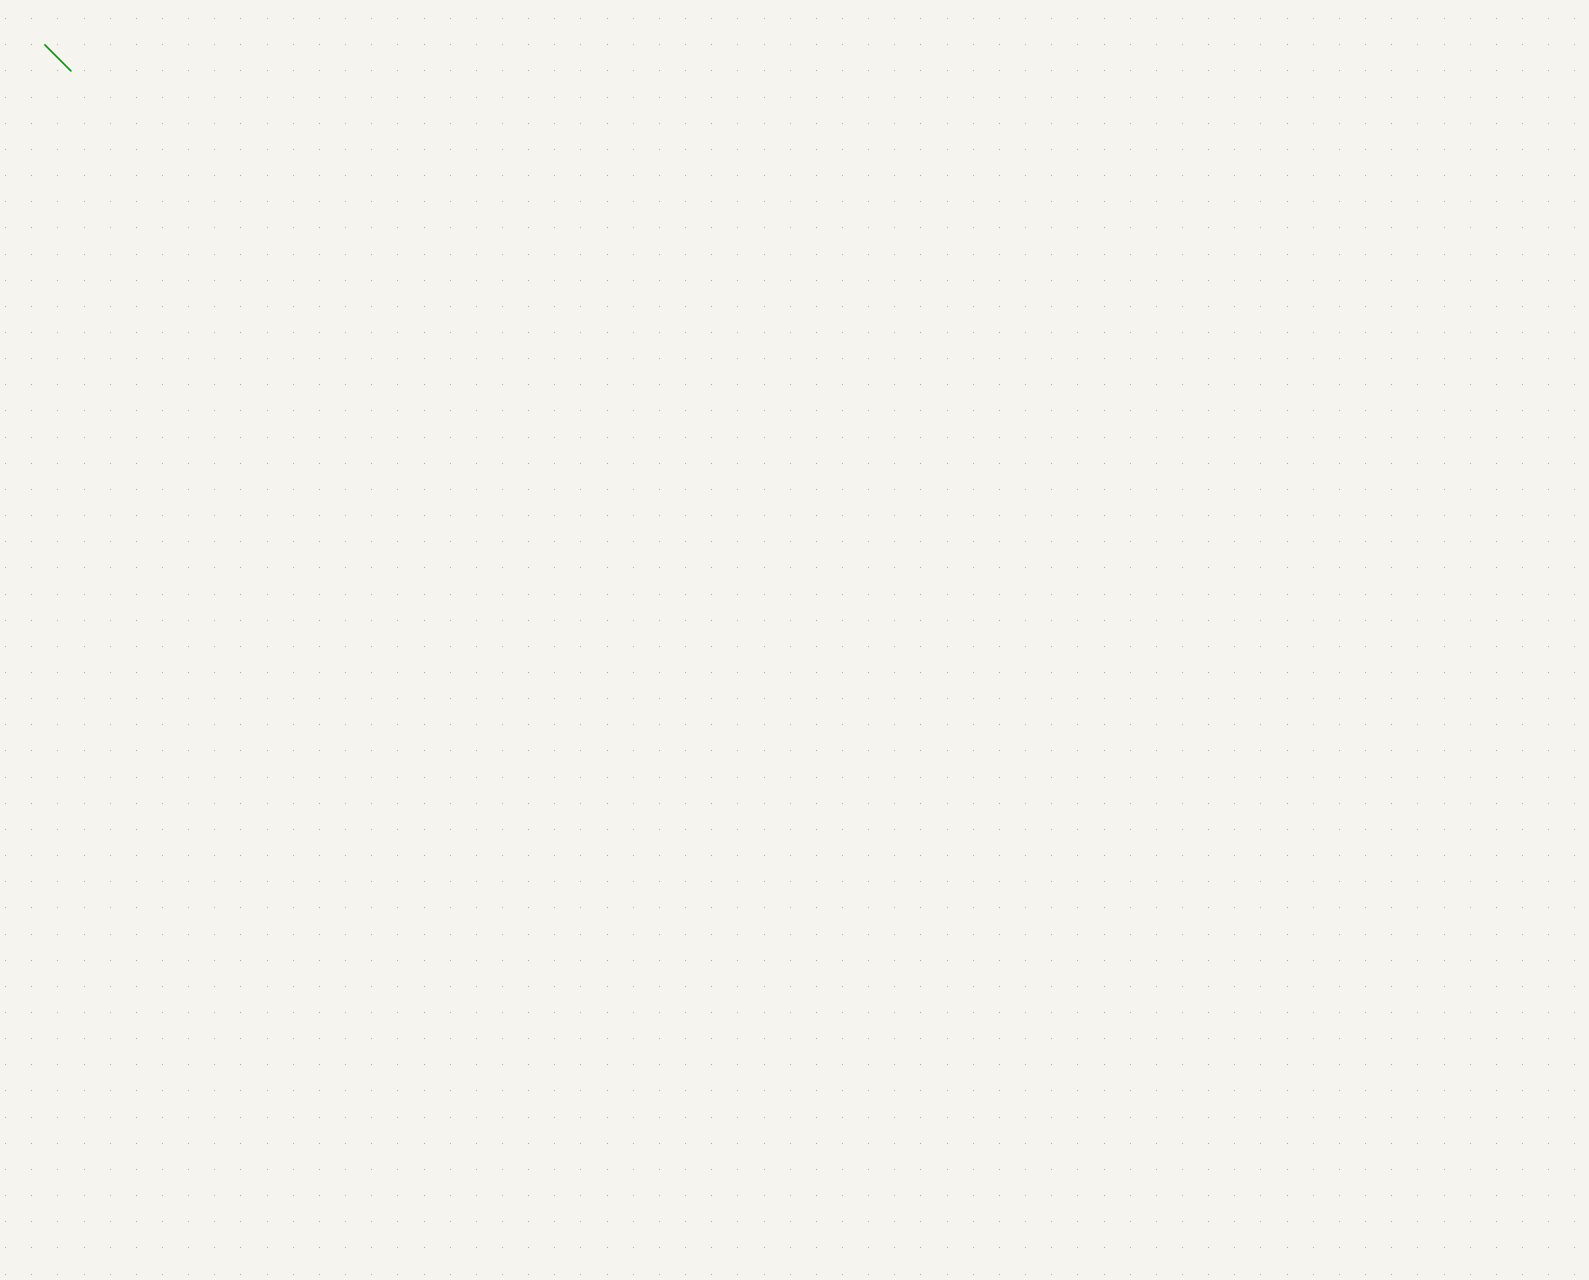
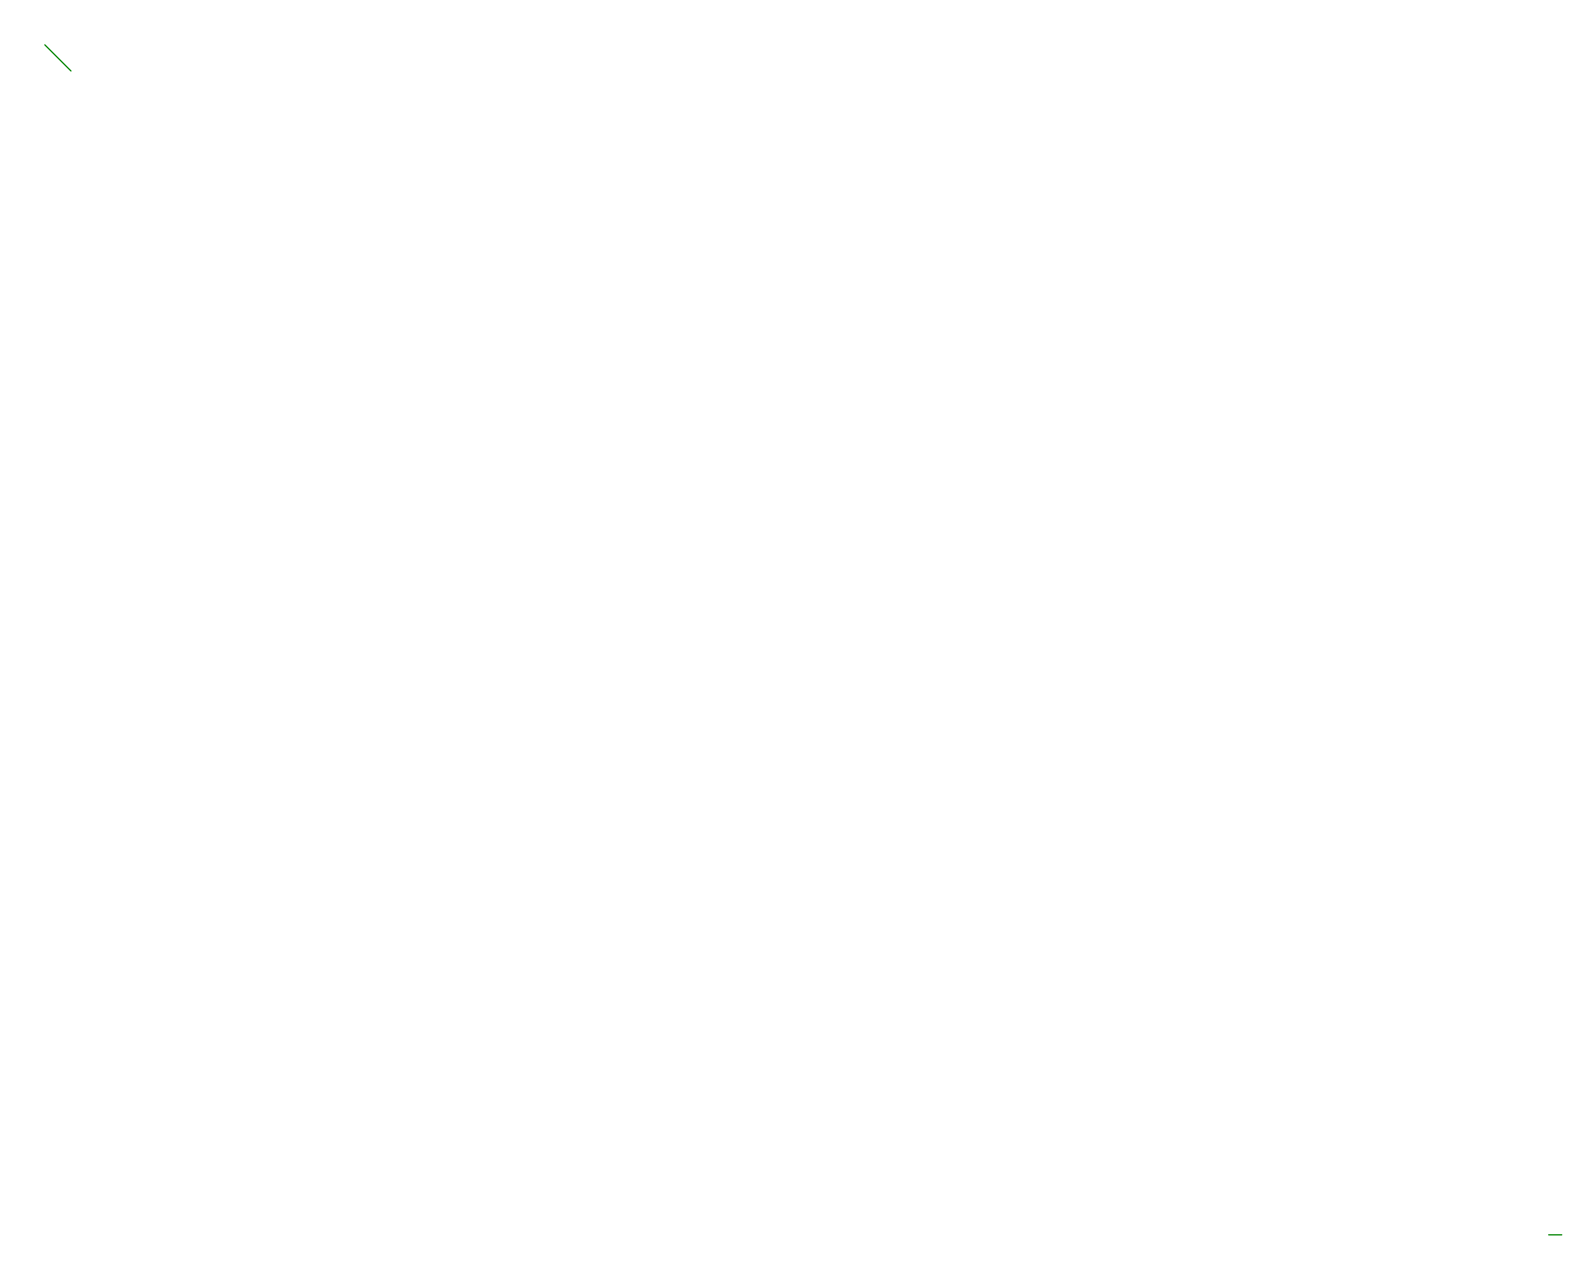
wire: none -> (1548, 1234) (1561, 1234)

